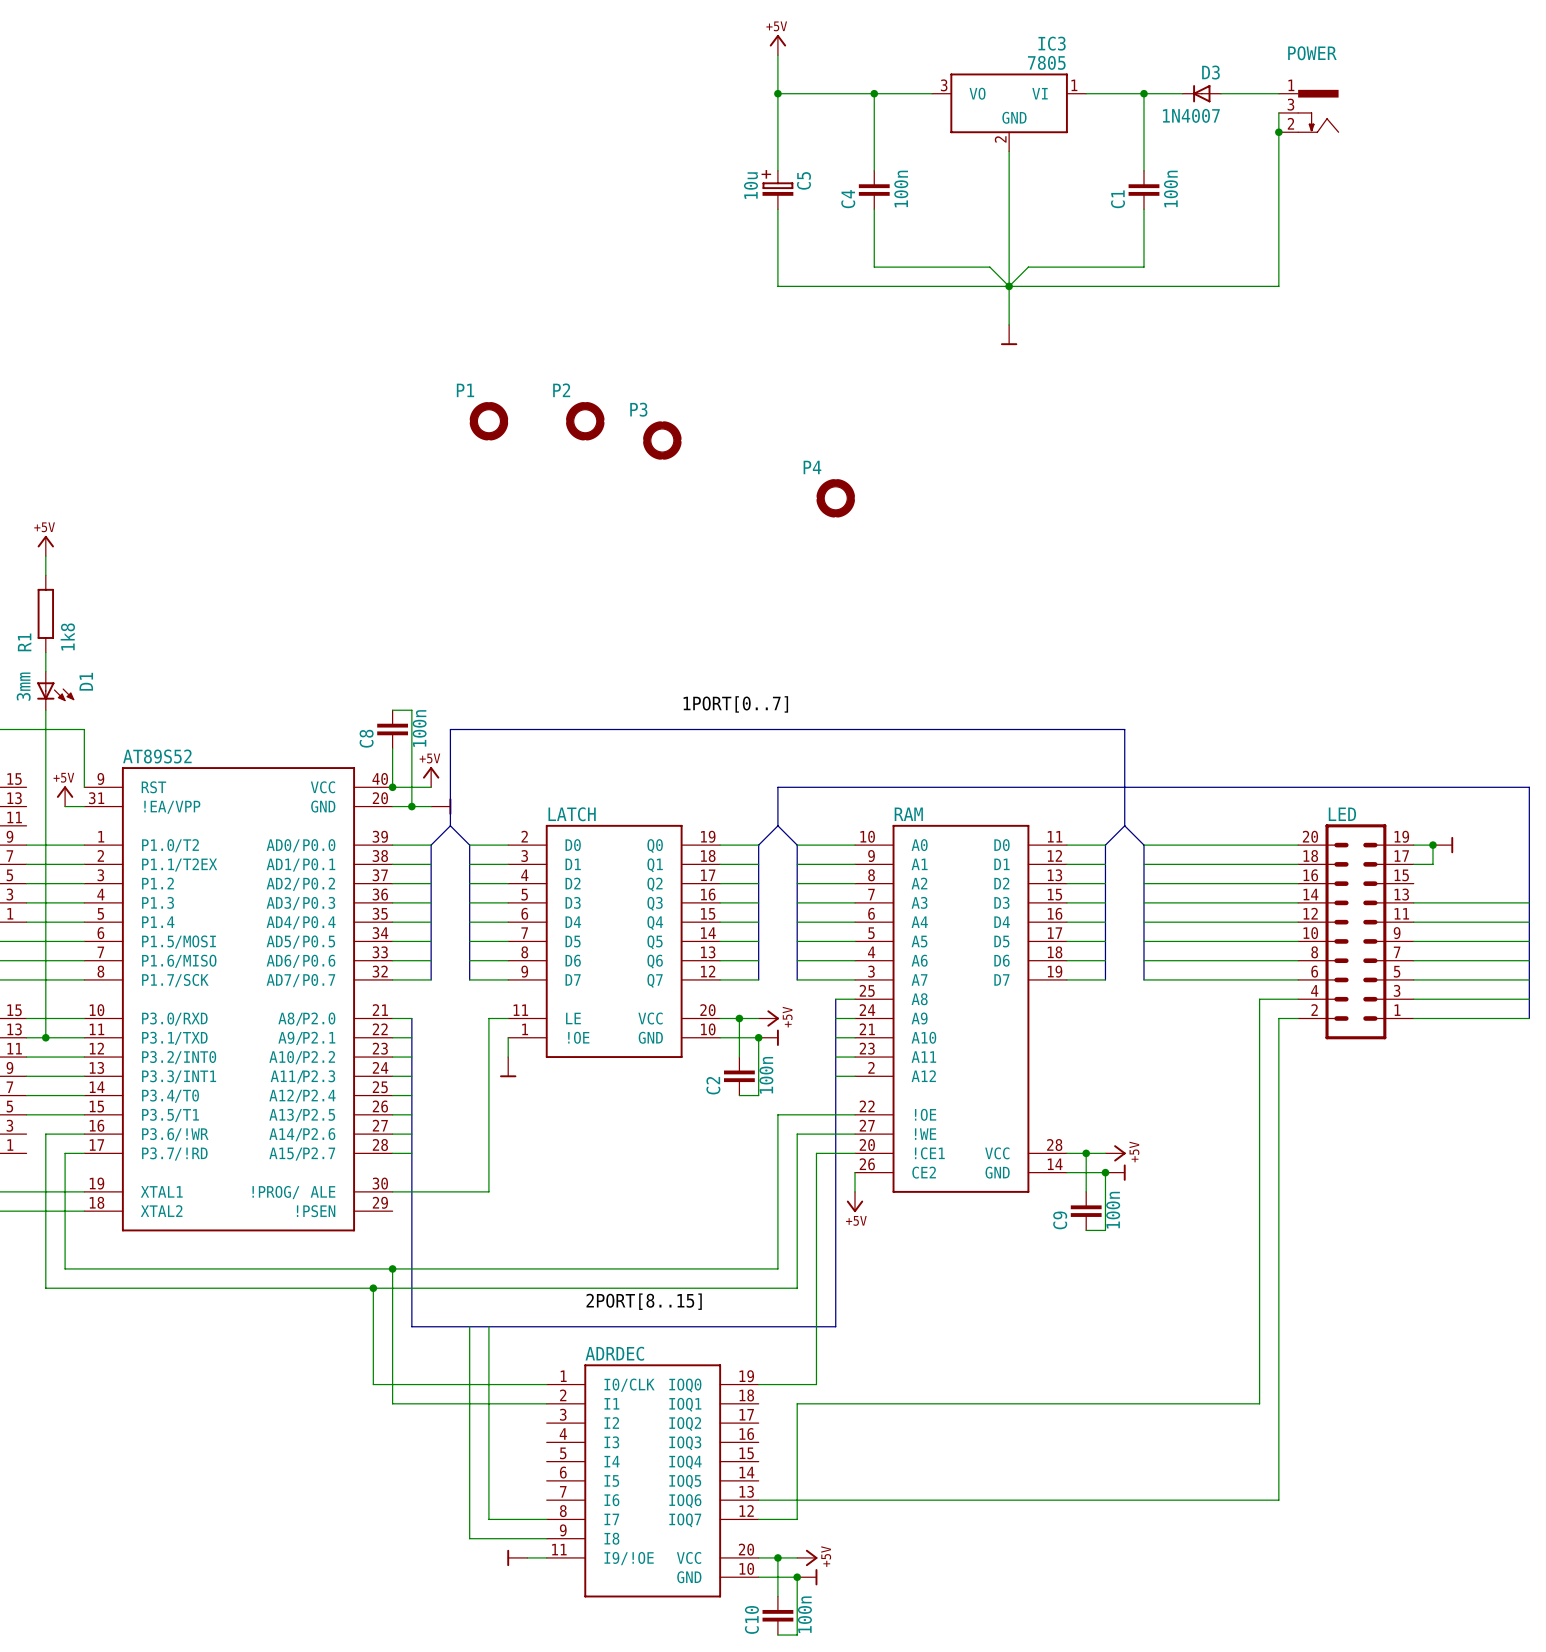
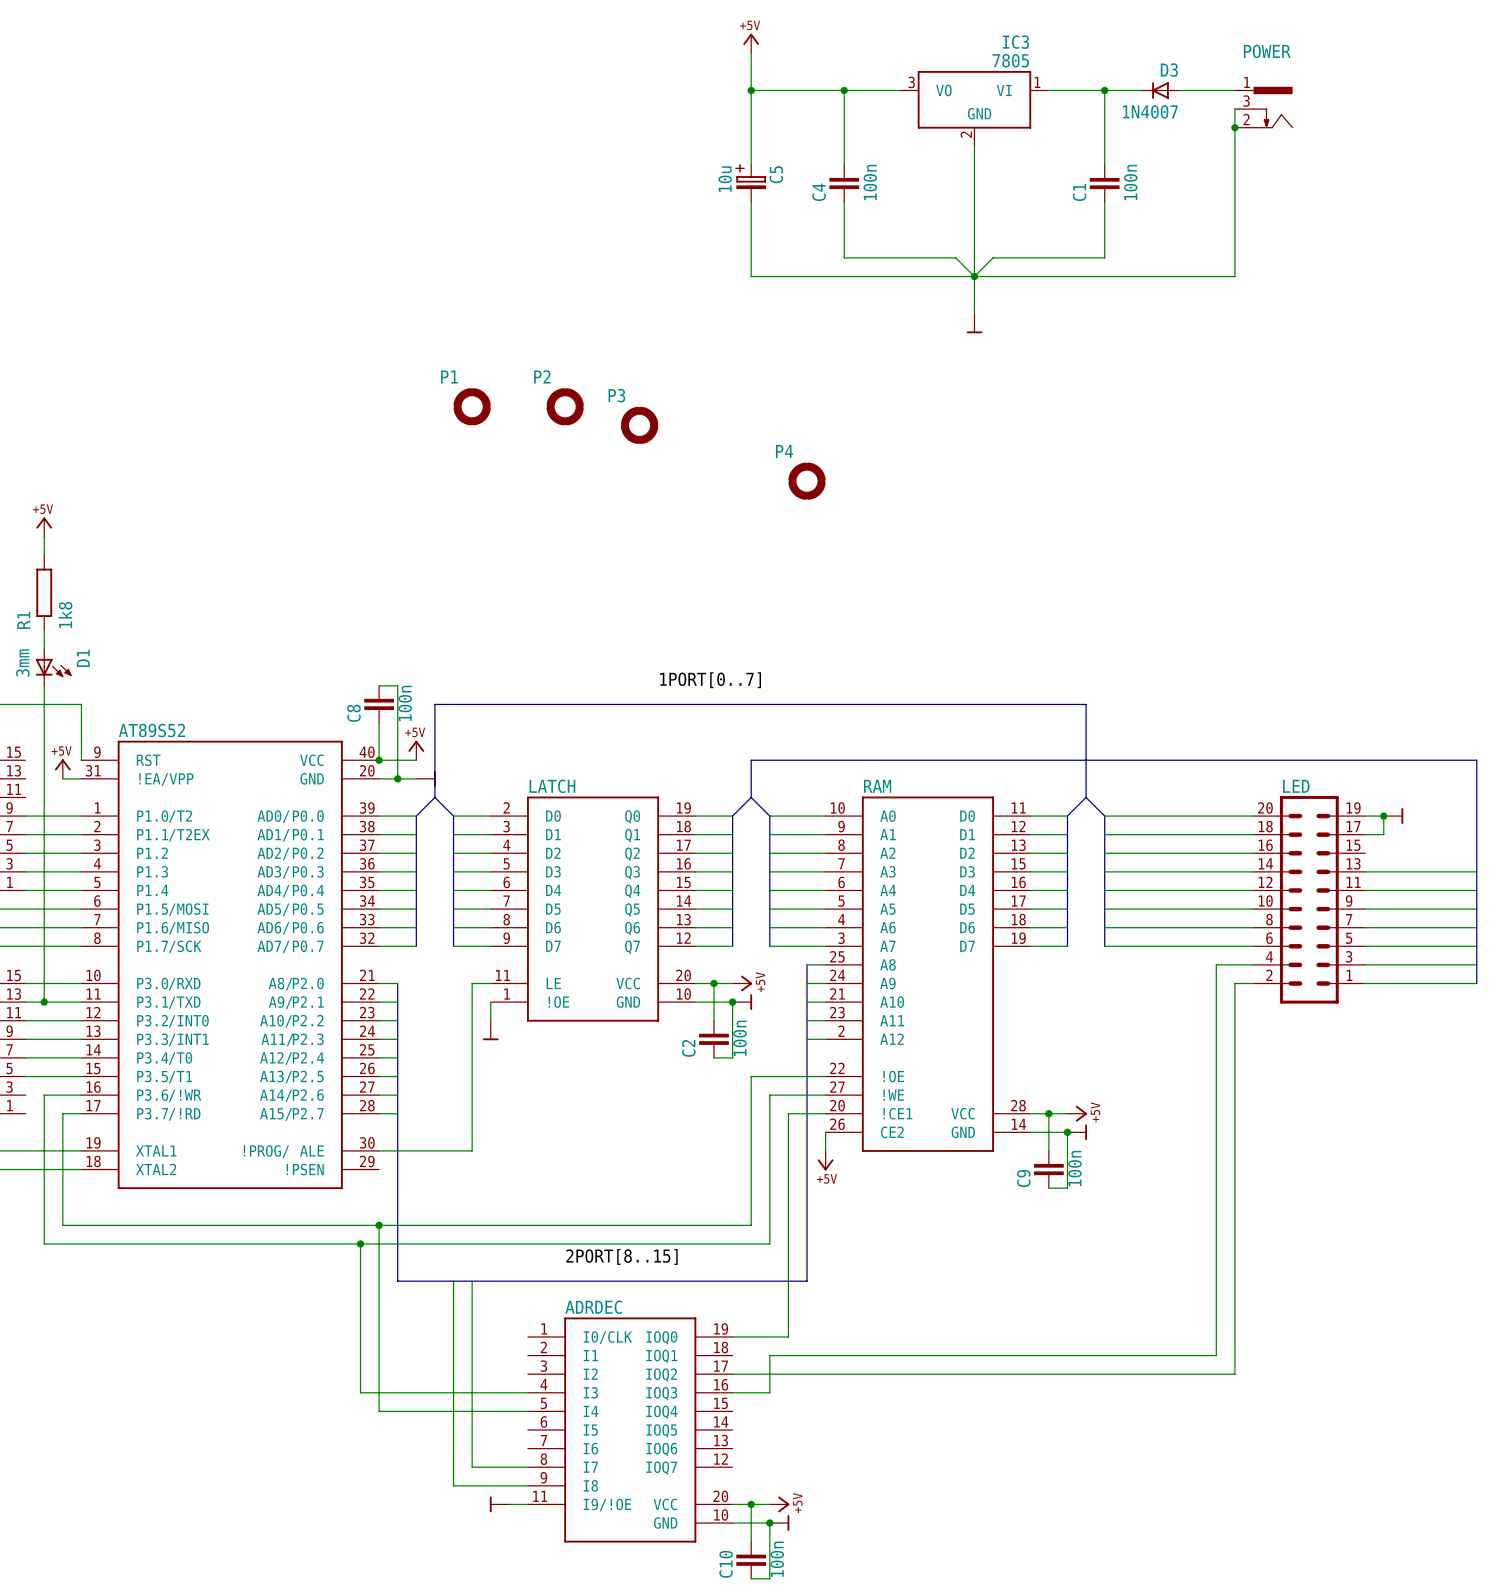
wire: (373, 1384) (546, 1384) -> (360, 1336) (360, 1392) (527, 1392)
wire: (392, 1403) (546, 1403) -> (379, 1355) (379, 1411) (527, 1411)
wire: (1278, 1423) (1278, 1500) (758, 1500) -> (1234, 1374) (732, 1374)
wire: (797, 1442) (797, 1519) (758, 1519) -> (769, 1392) (732, 1392)

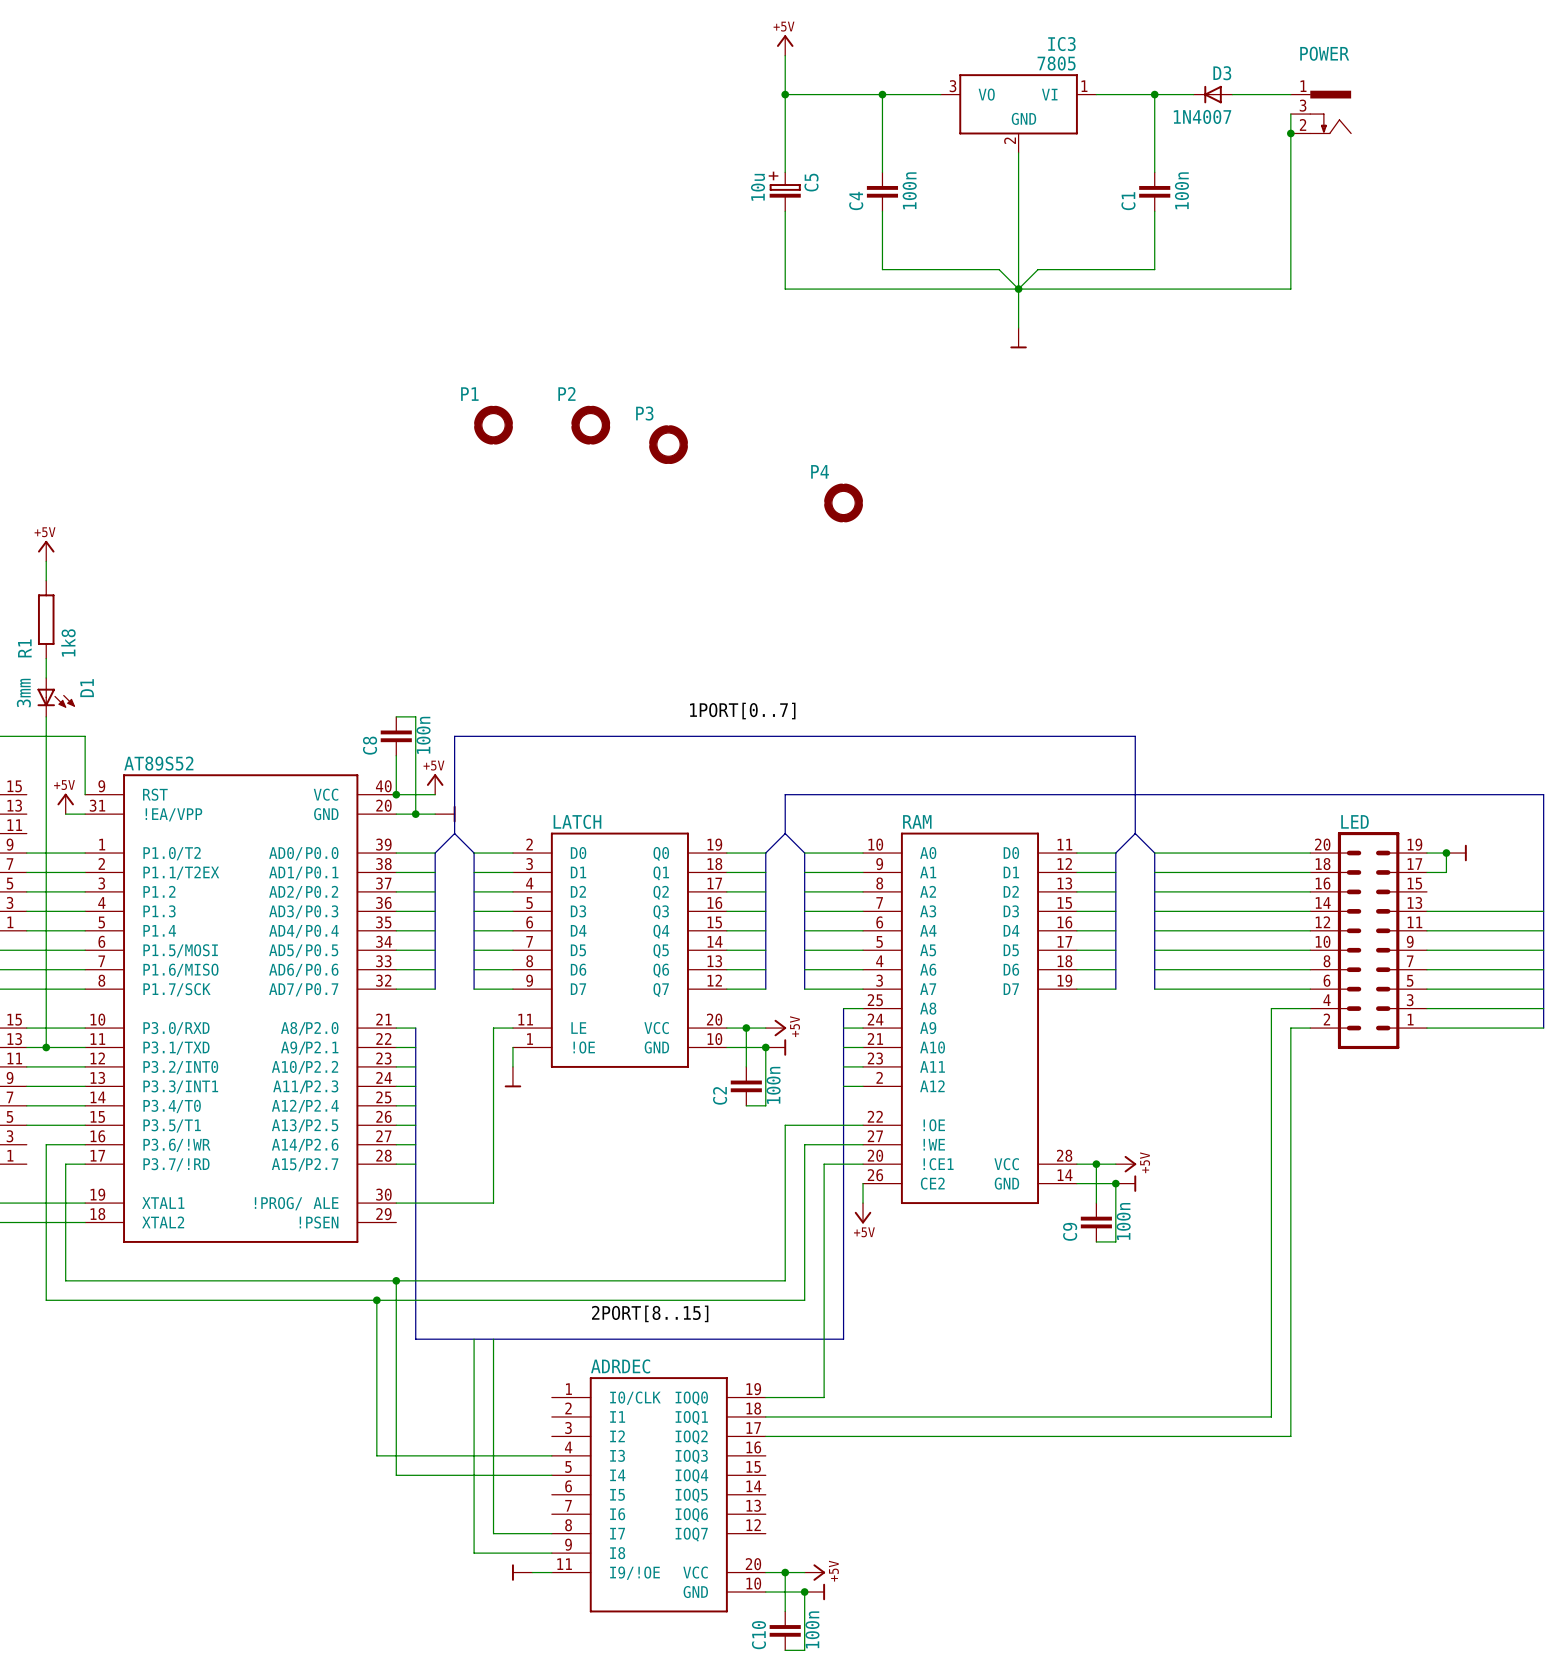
wire: (769, 1355) (769, 1392) (732, 1392) -> (804, 1416) (765, 1416)

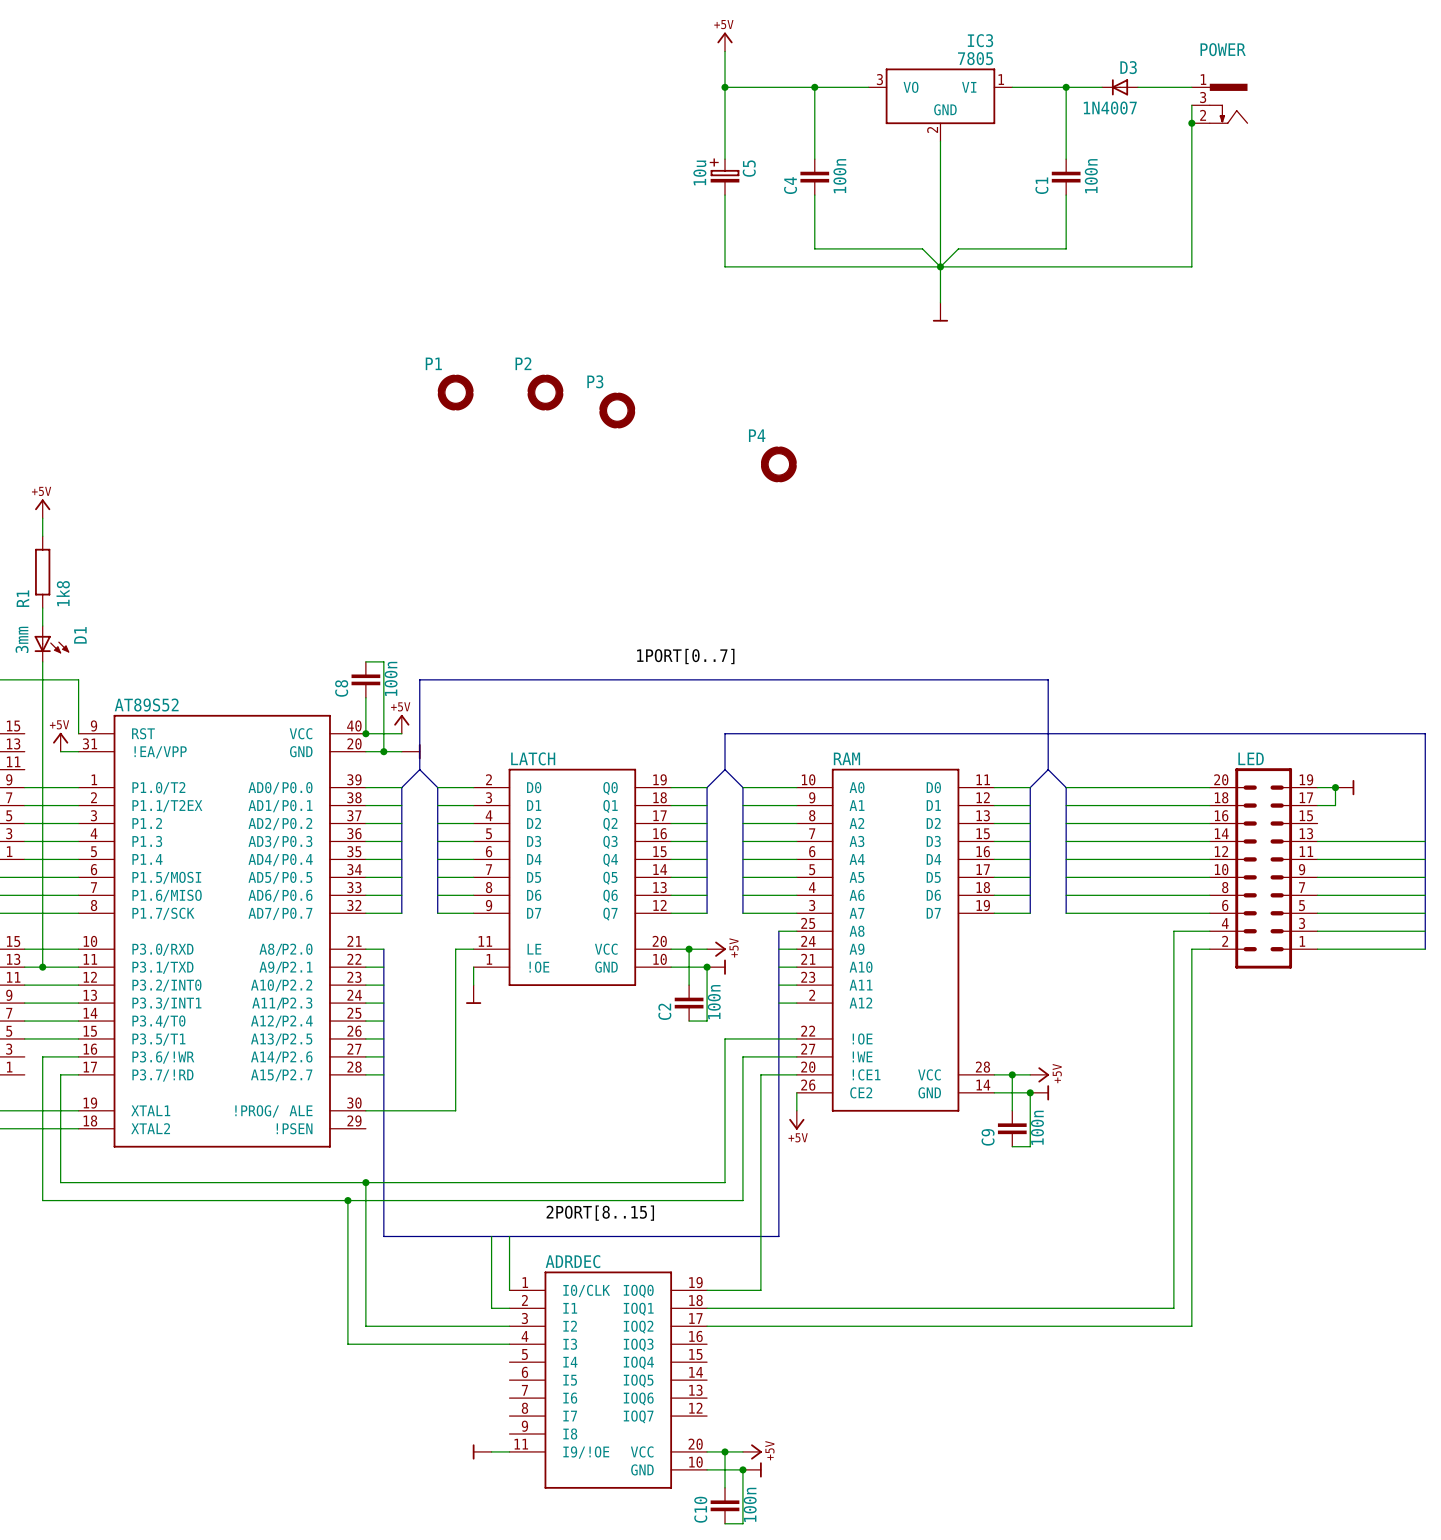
wire: (474, 1339) (474, 1553) (551, 1553) -> none
wire: (493, 1339) (493, 1533) (551, 1533) -> none
wire: none -> (491, 1236) (491, 1308) (509, 1308)
wire: none -> (509, 1236) (509, 1290)
wire: (396, 1436) (396, 1475) (551, 1475) -> (365, 1326) (509, 1326)

